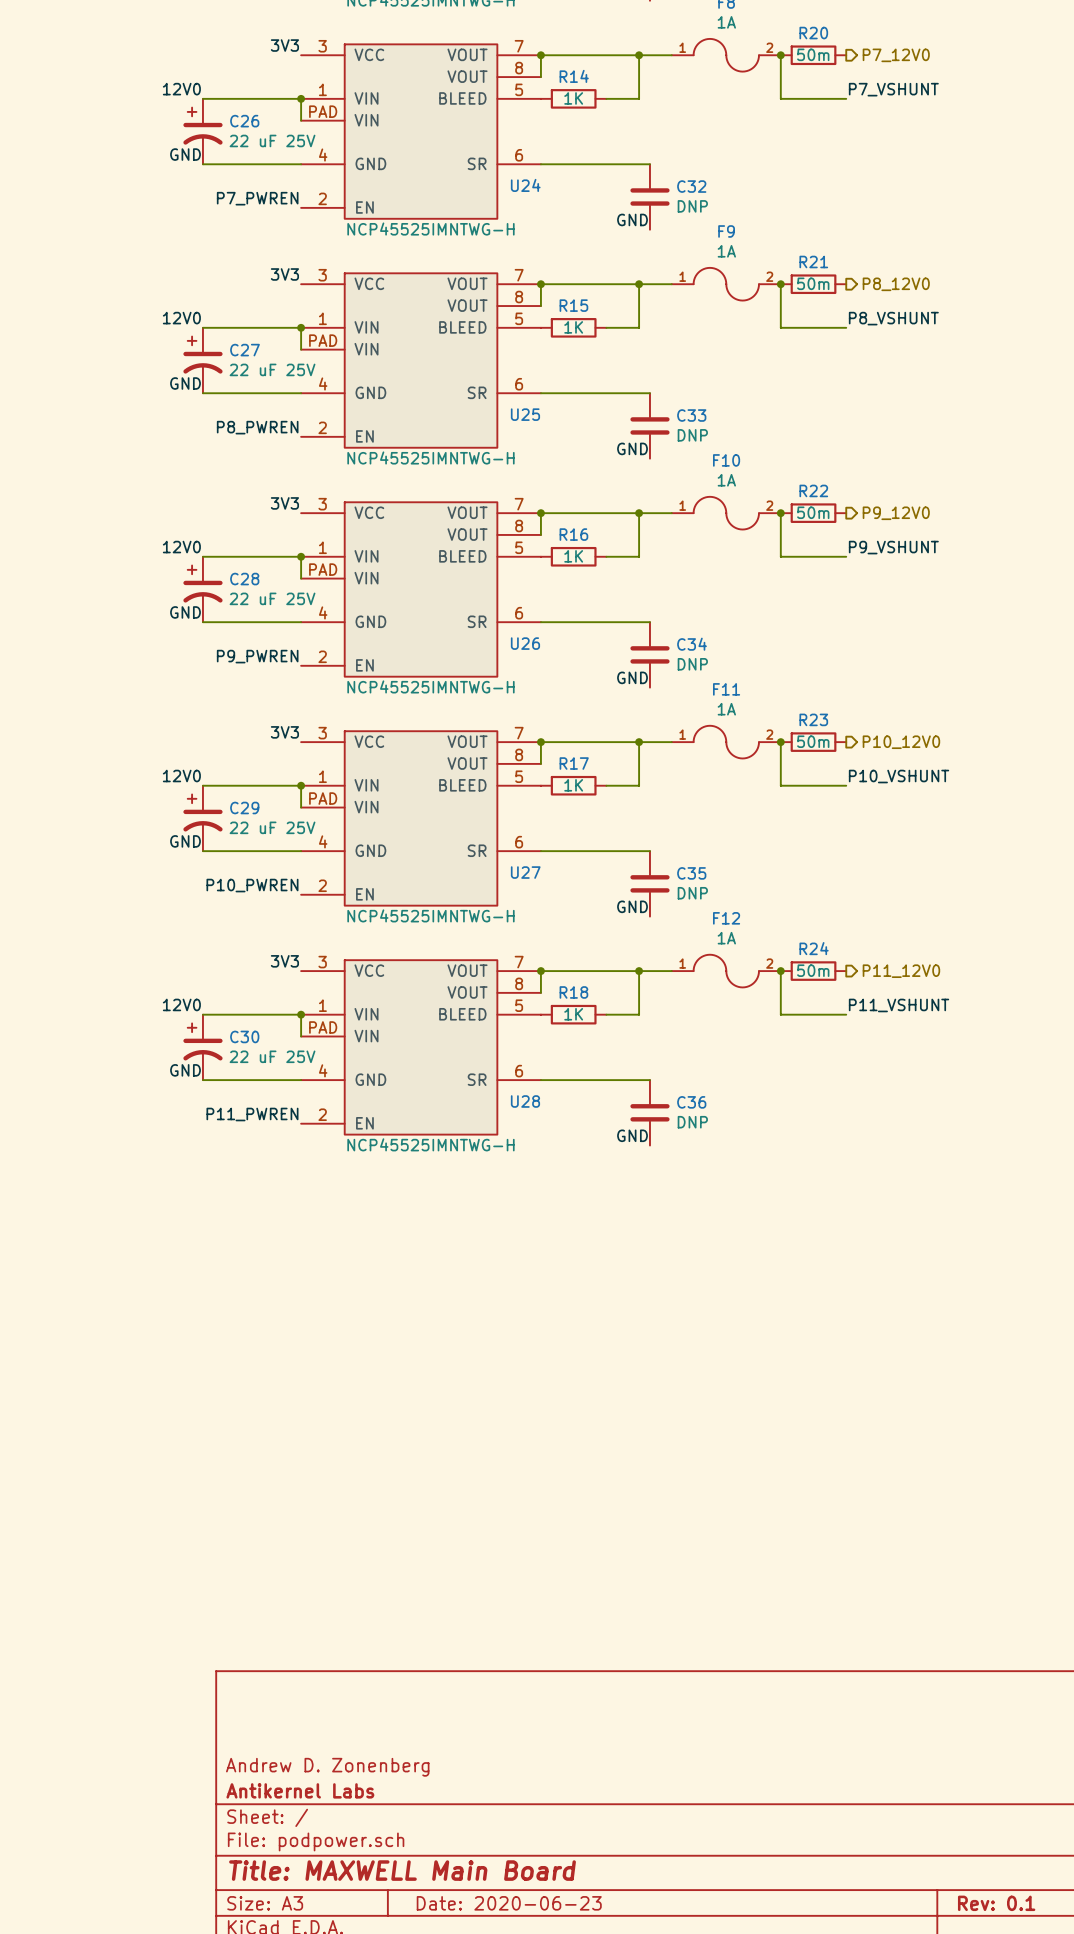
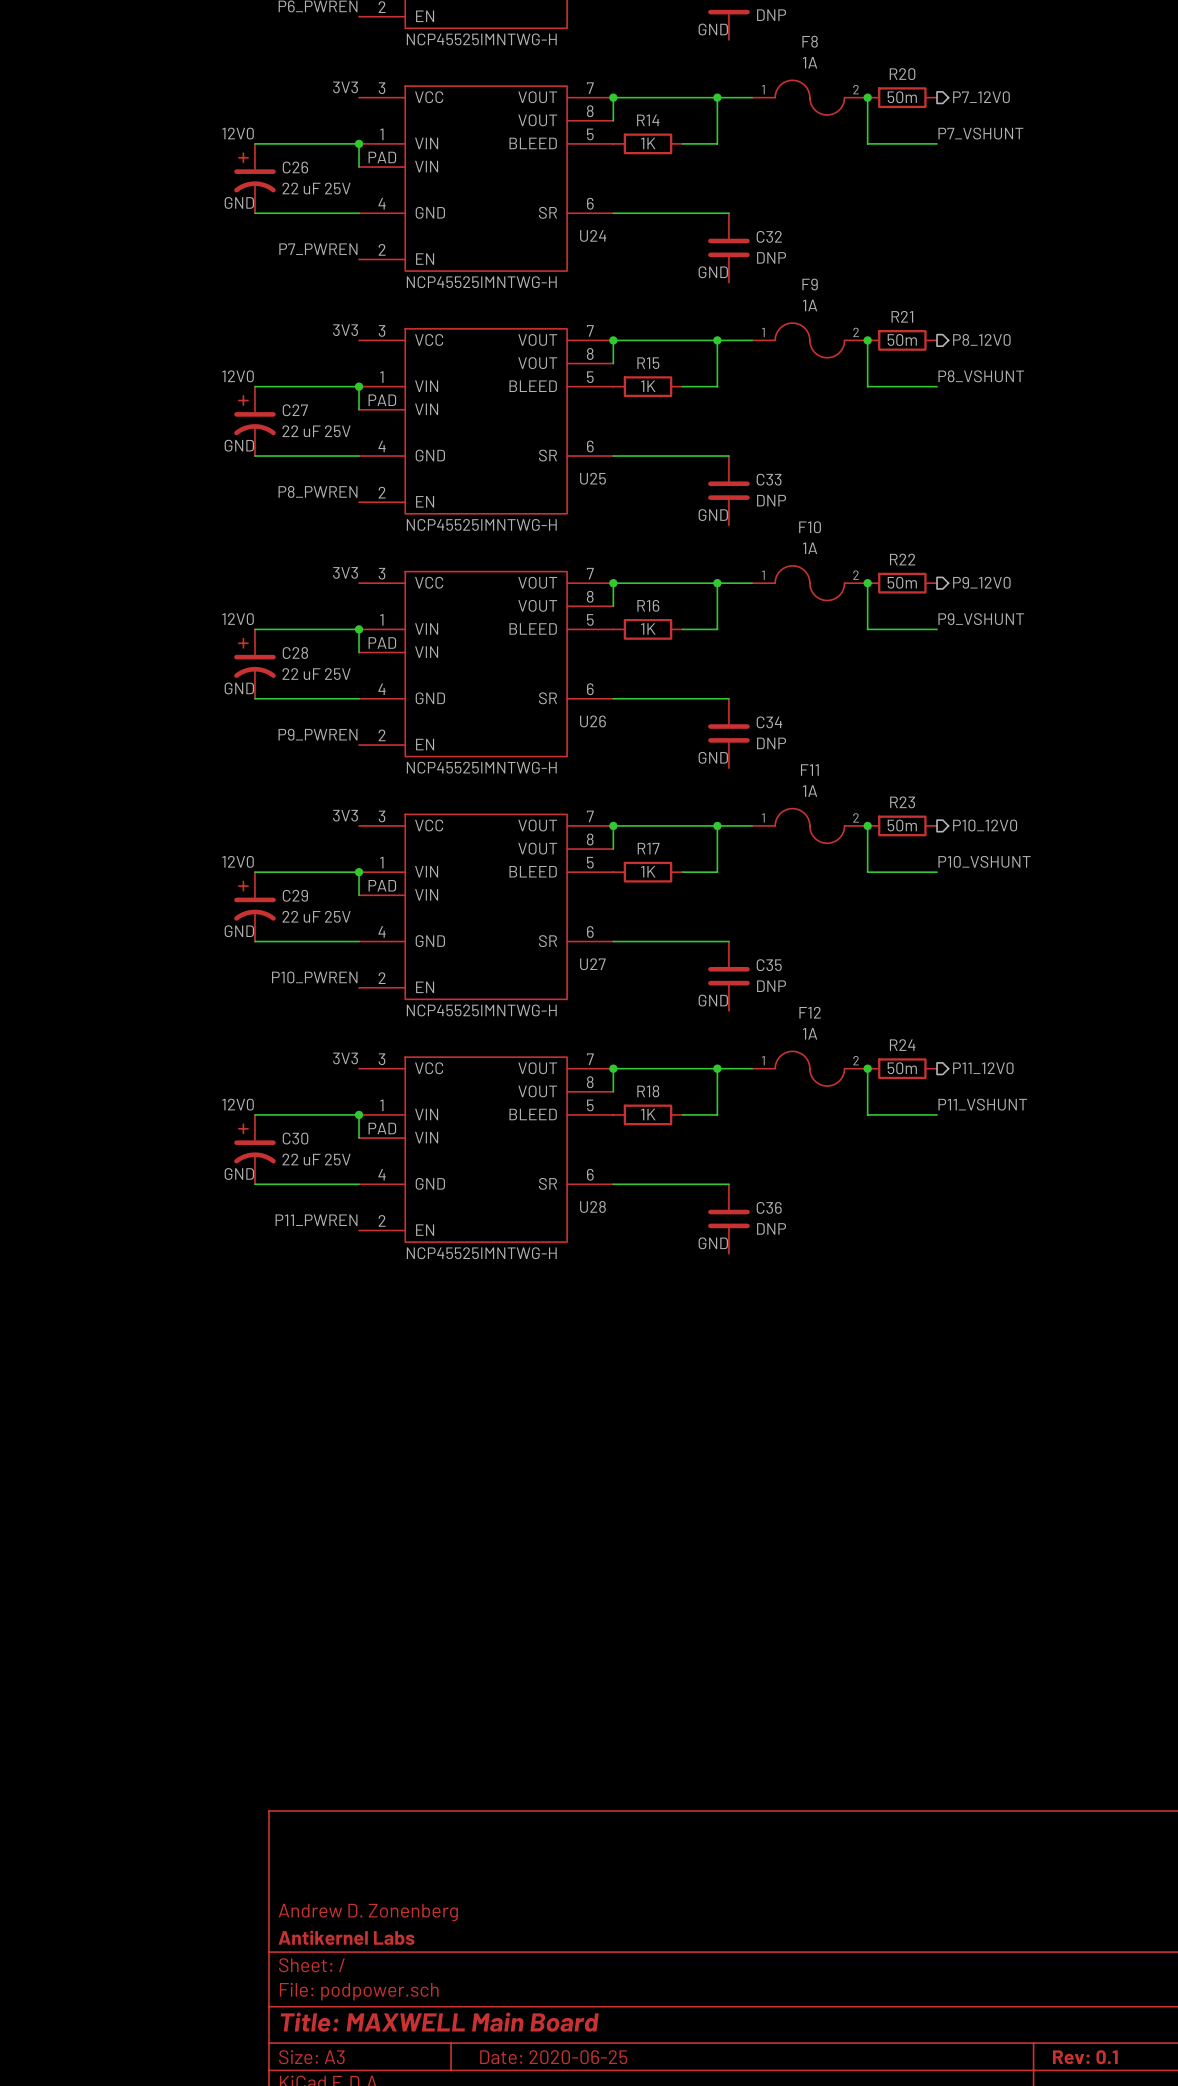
title block: Date: 2020-06-23 (509, 1903) -> Date: 2020-06-25 (553, 2057)

